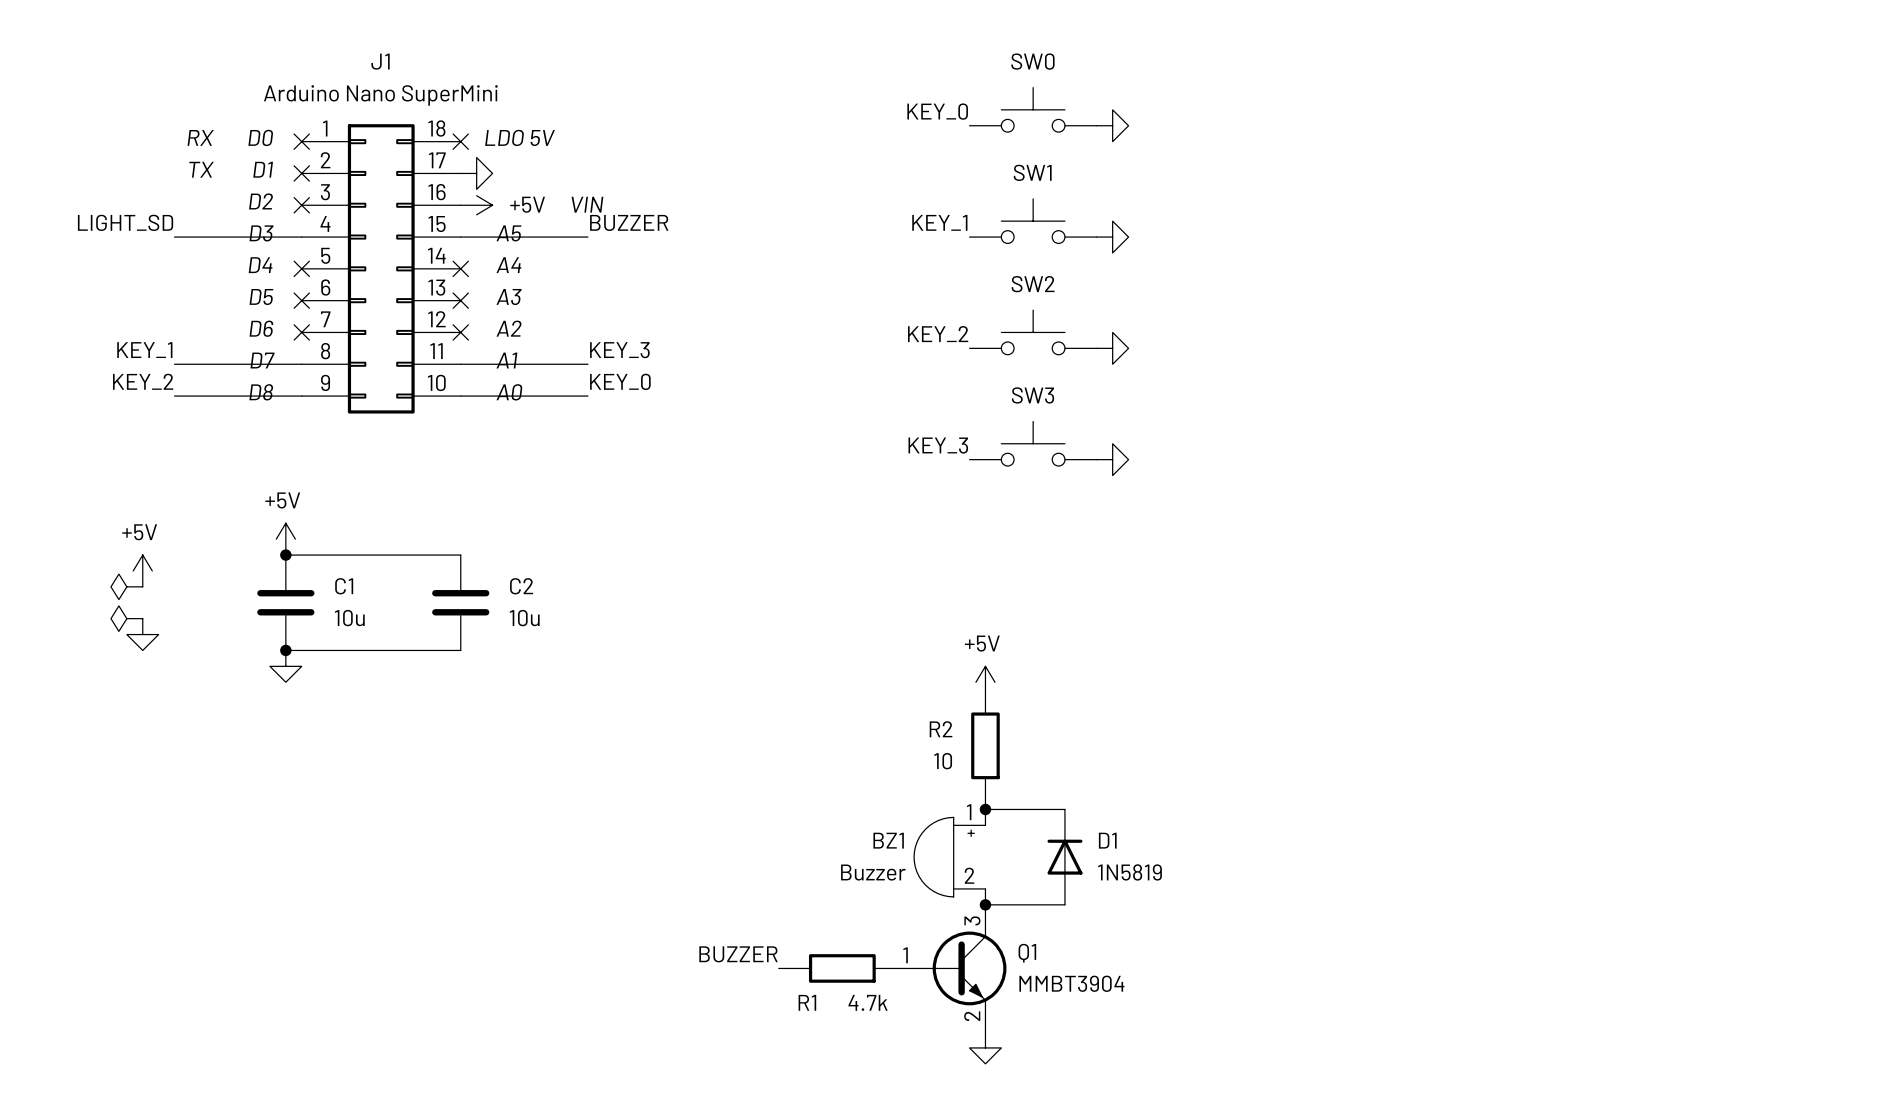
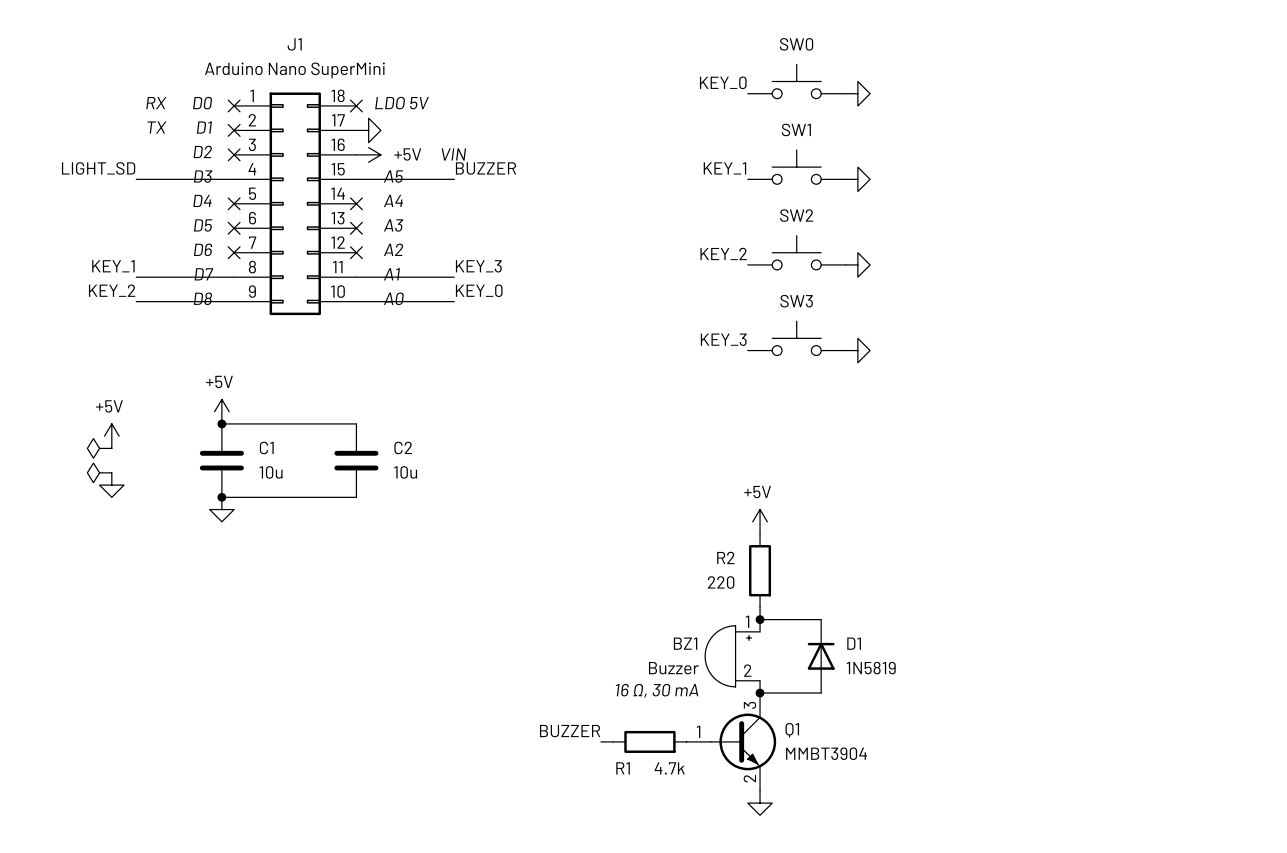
R2 value: 10 (943, 761) -> 220 (721, 582)
text: none -> 16 Ω, 30 mA (657, 690)

